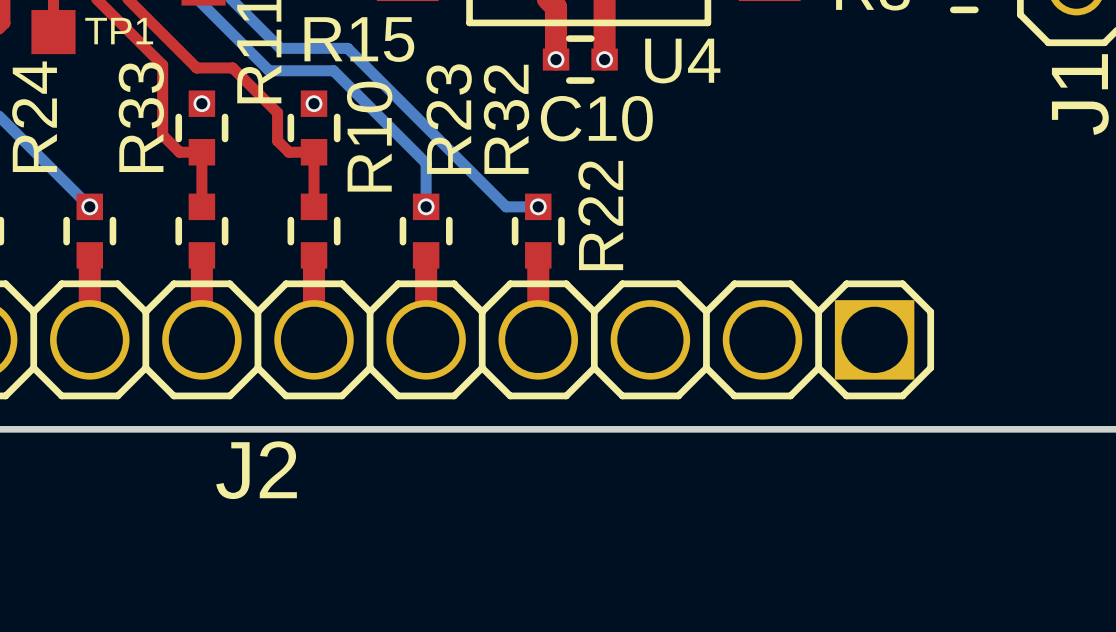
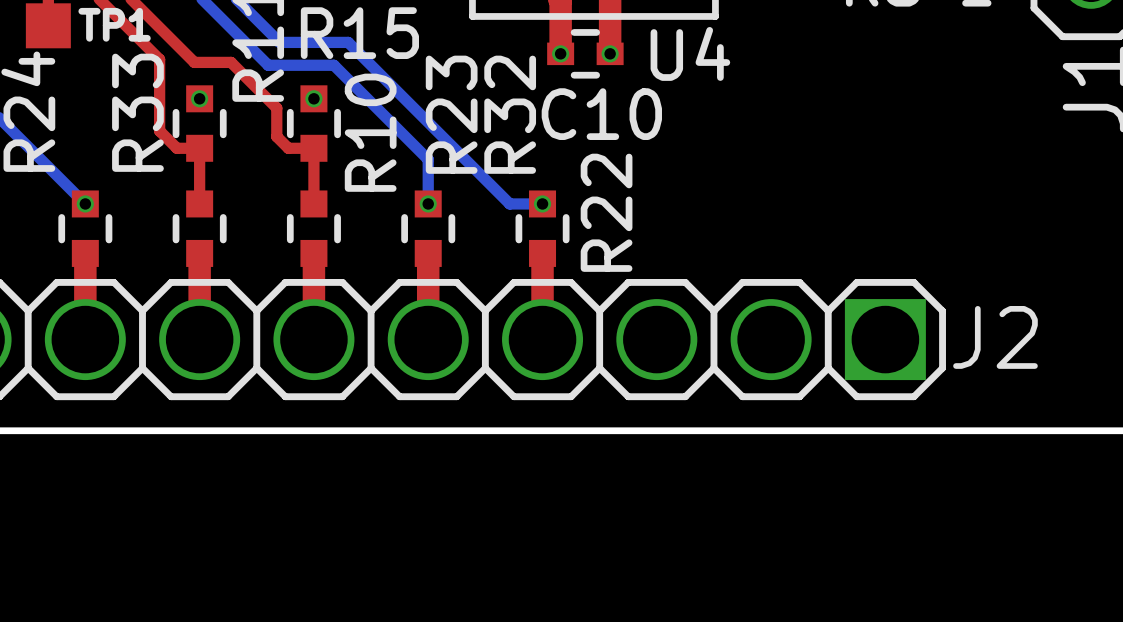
J2 name position: J2 (256, 470) -> J2 (995, 337)

